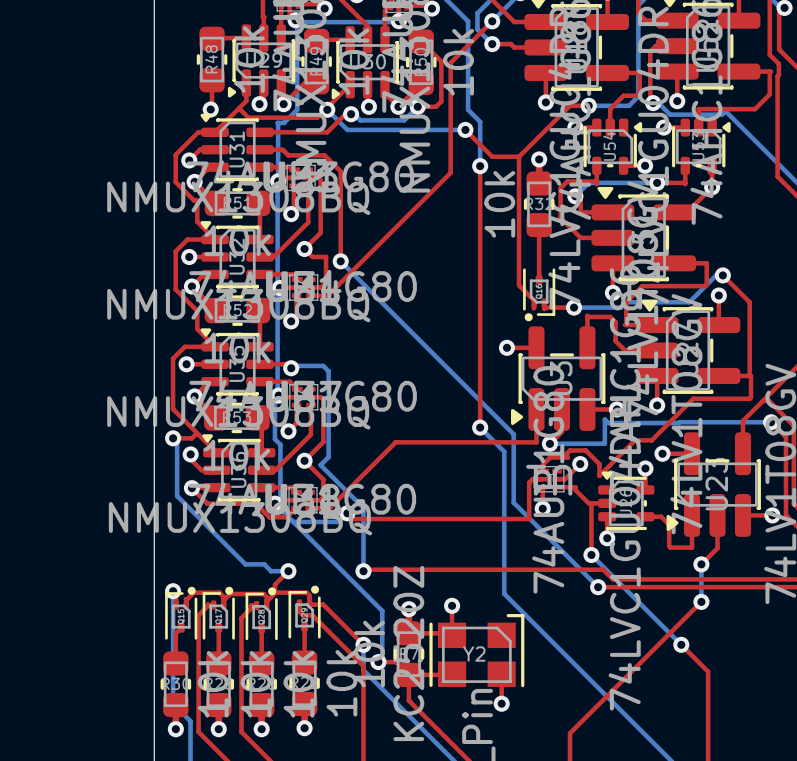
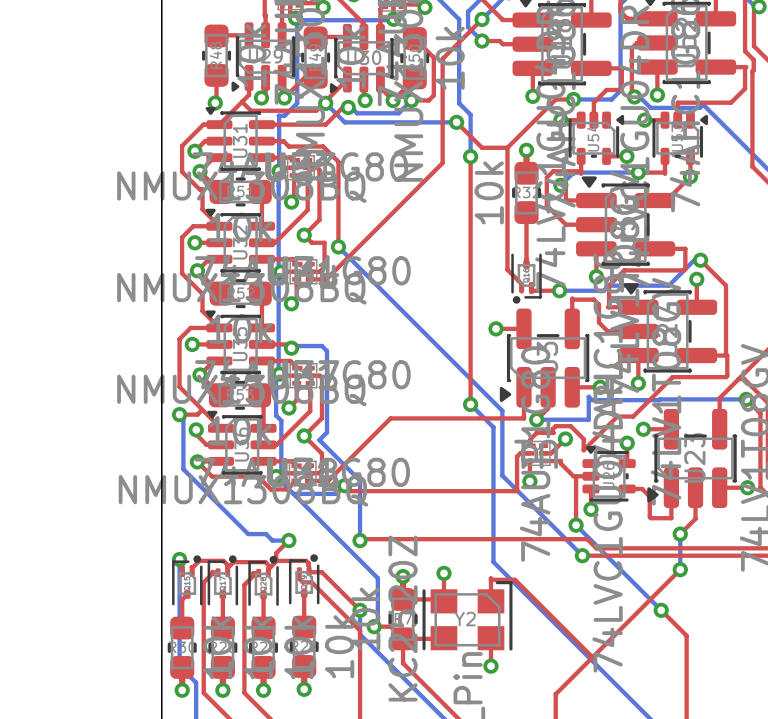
top track: none -> (490, 579) (515, 579) (592, 657)

